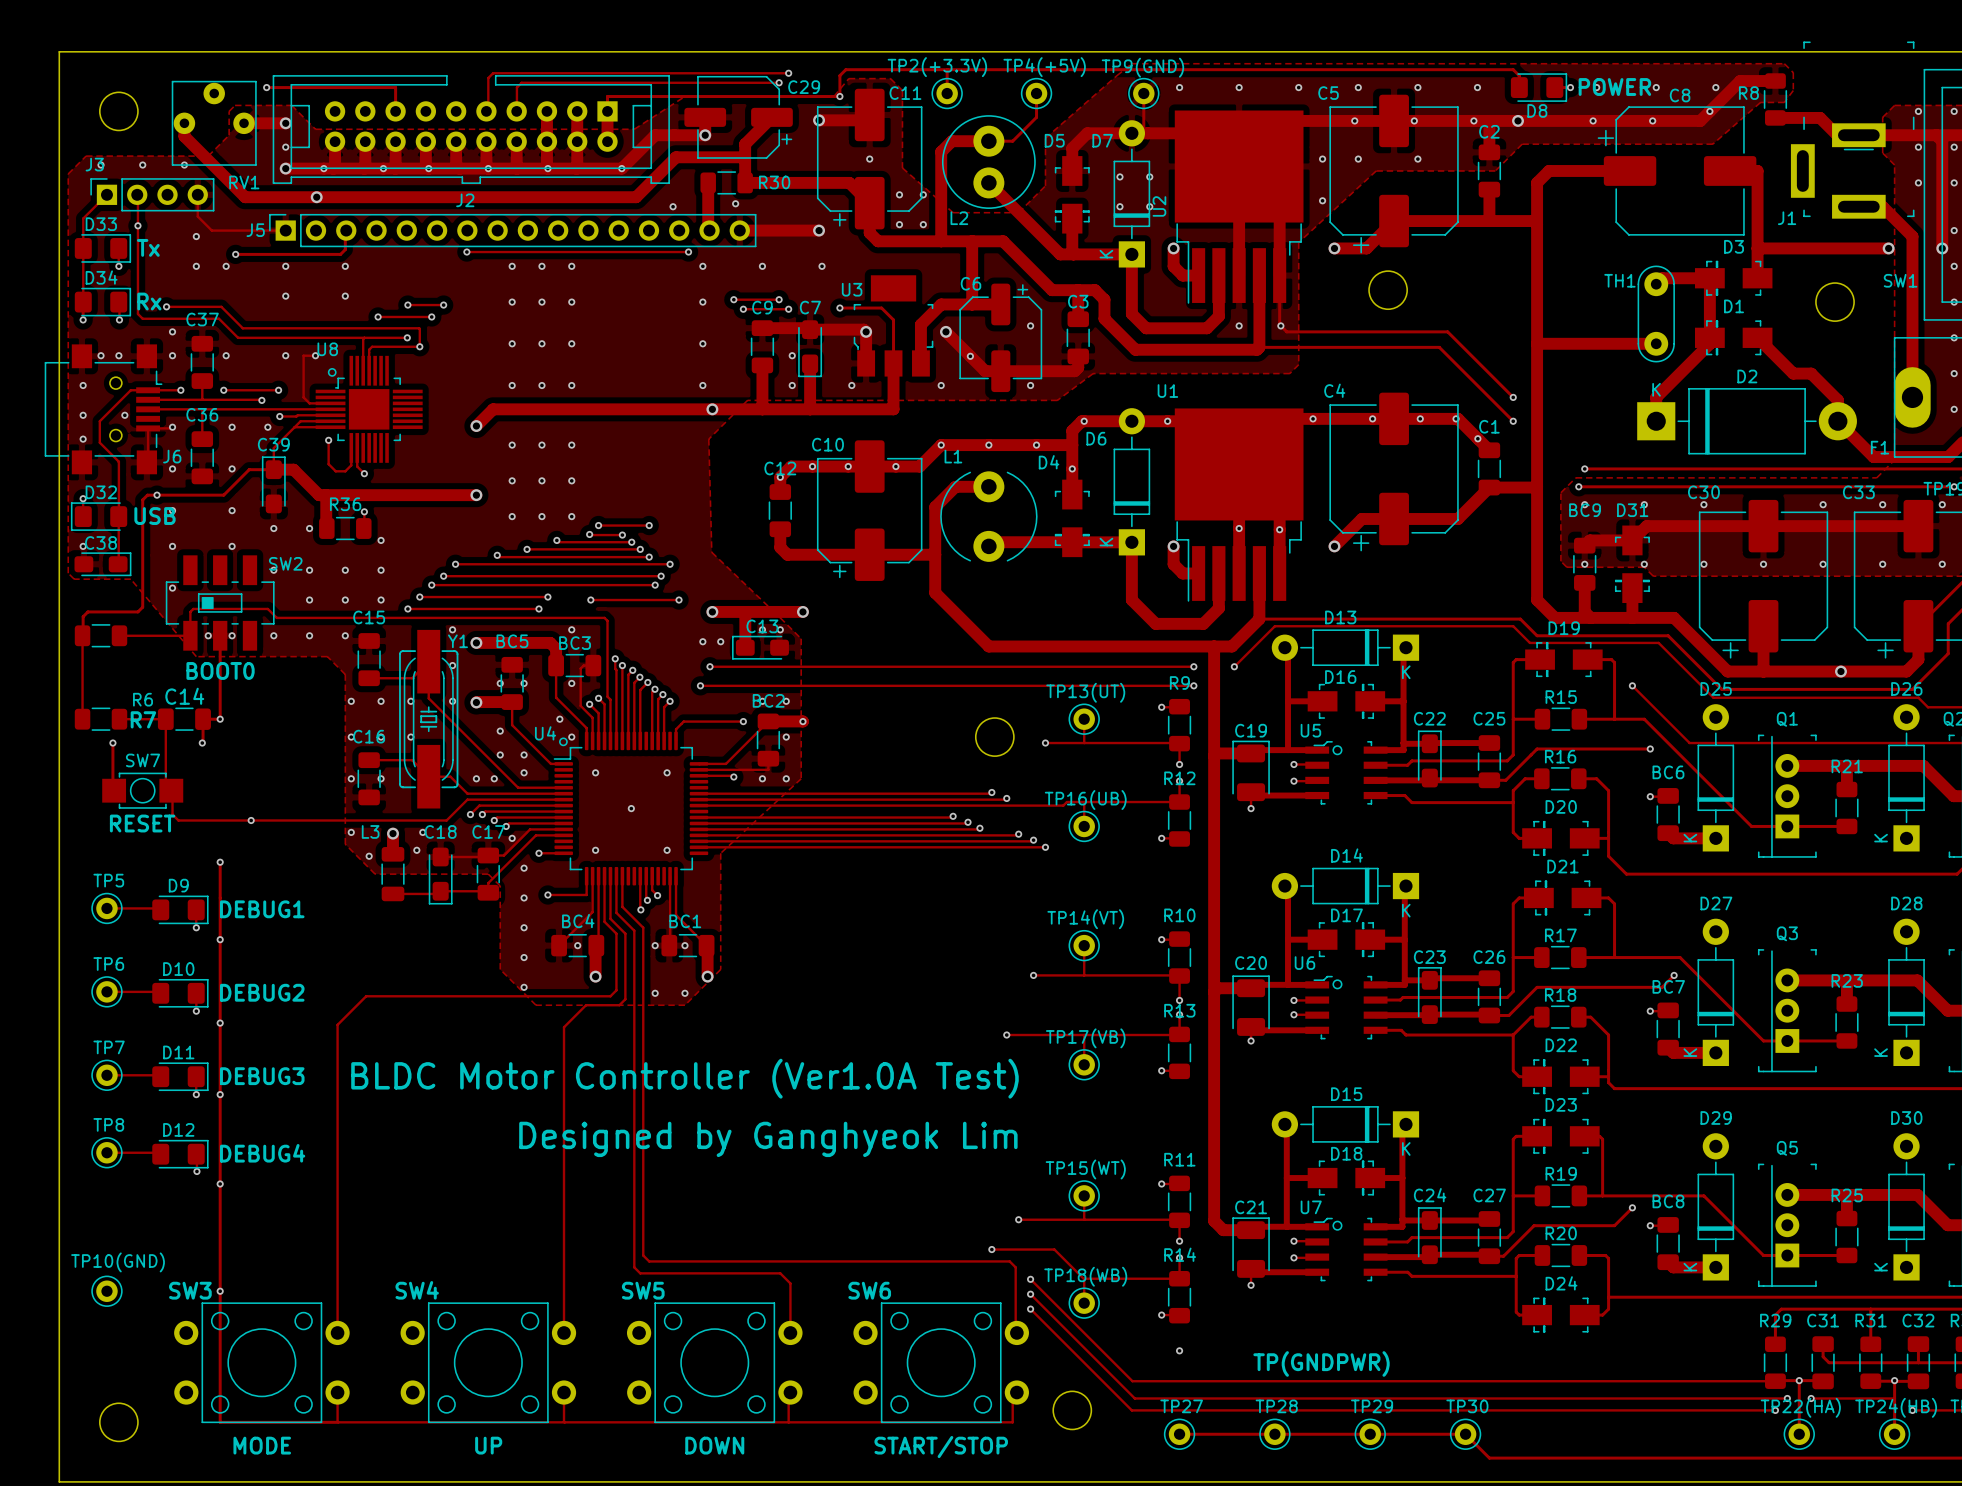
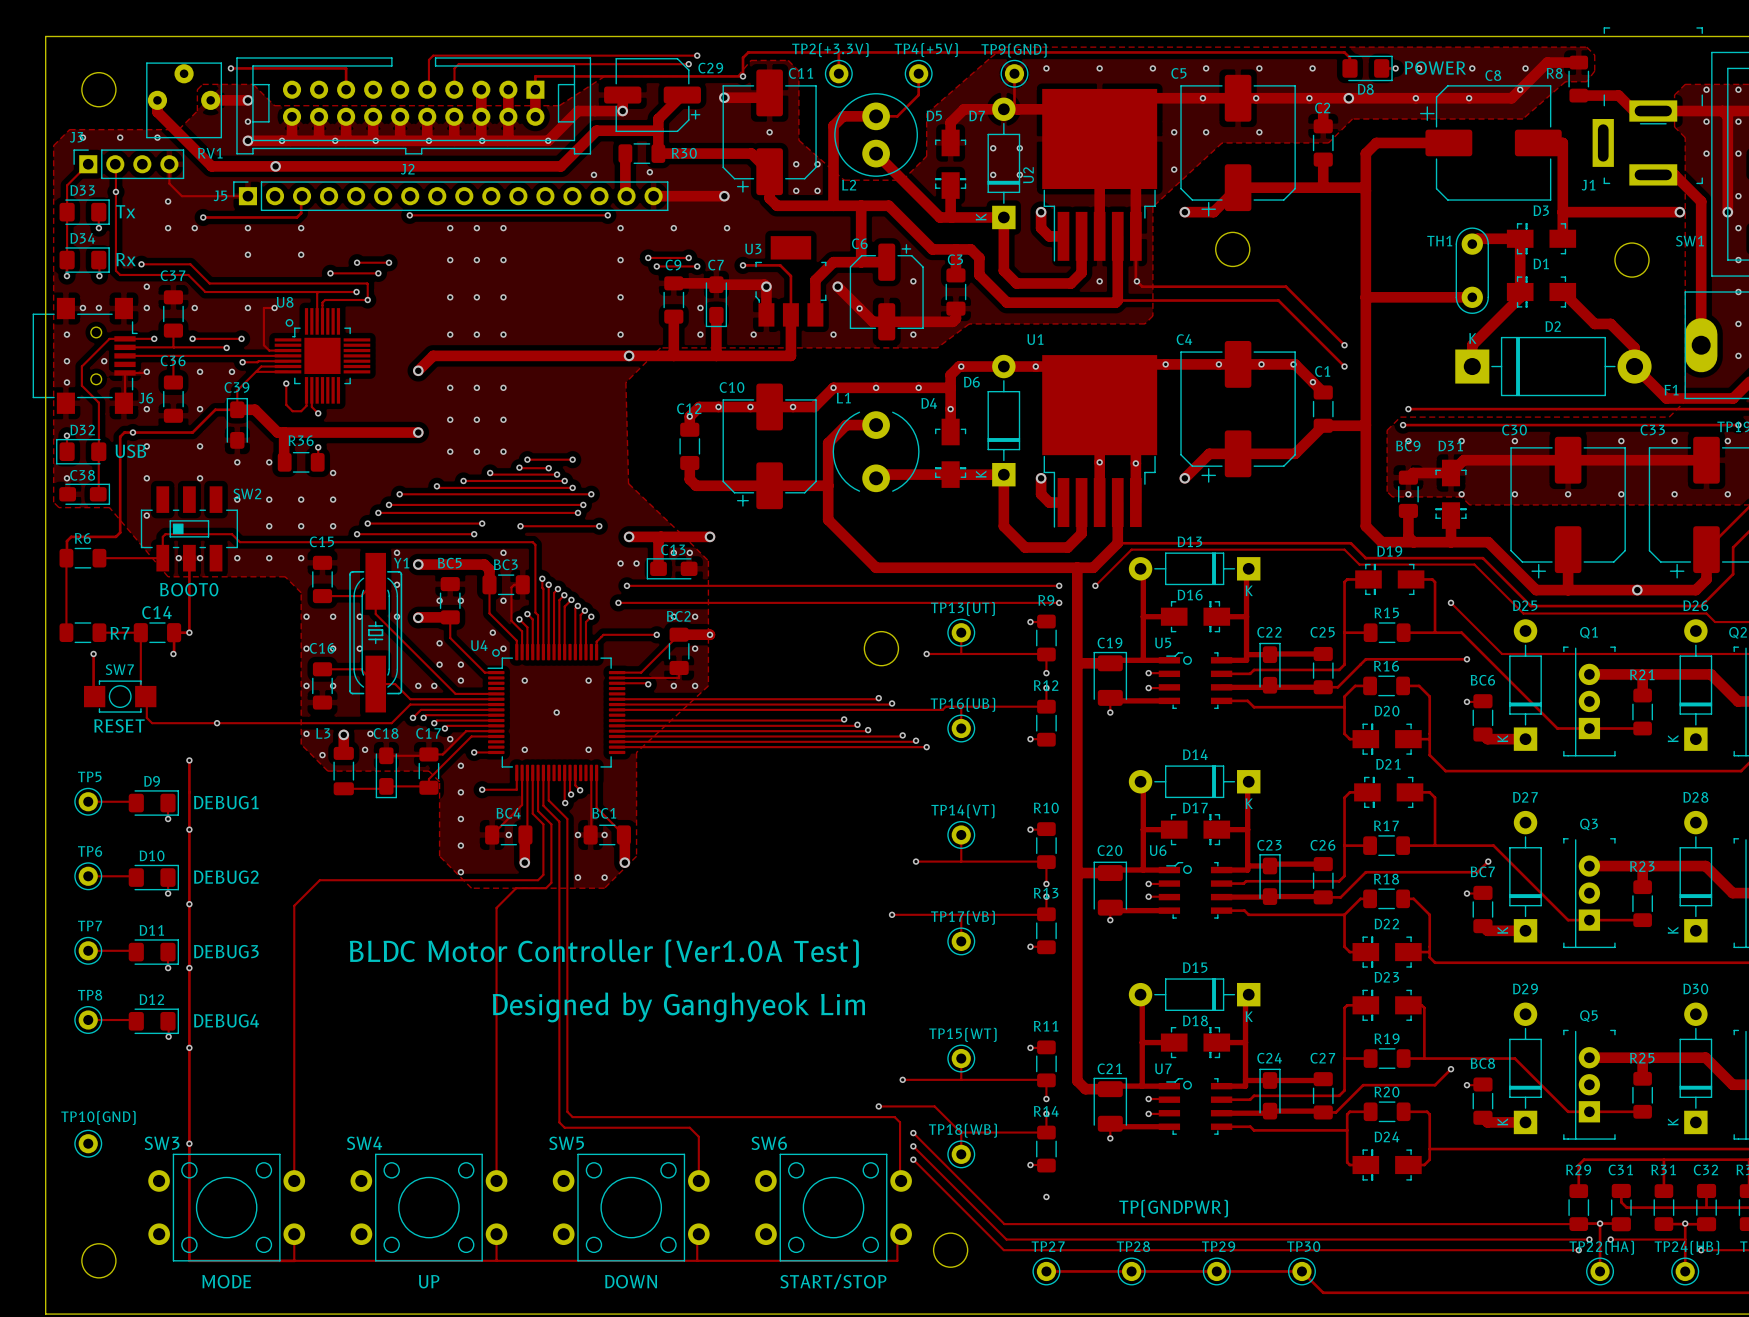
R6 name position: R6 (143, 699) -> R6 (82, 538)

